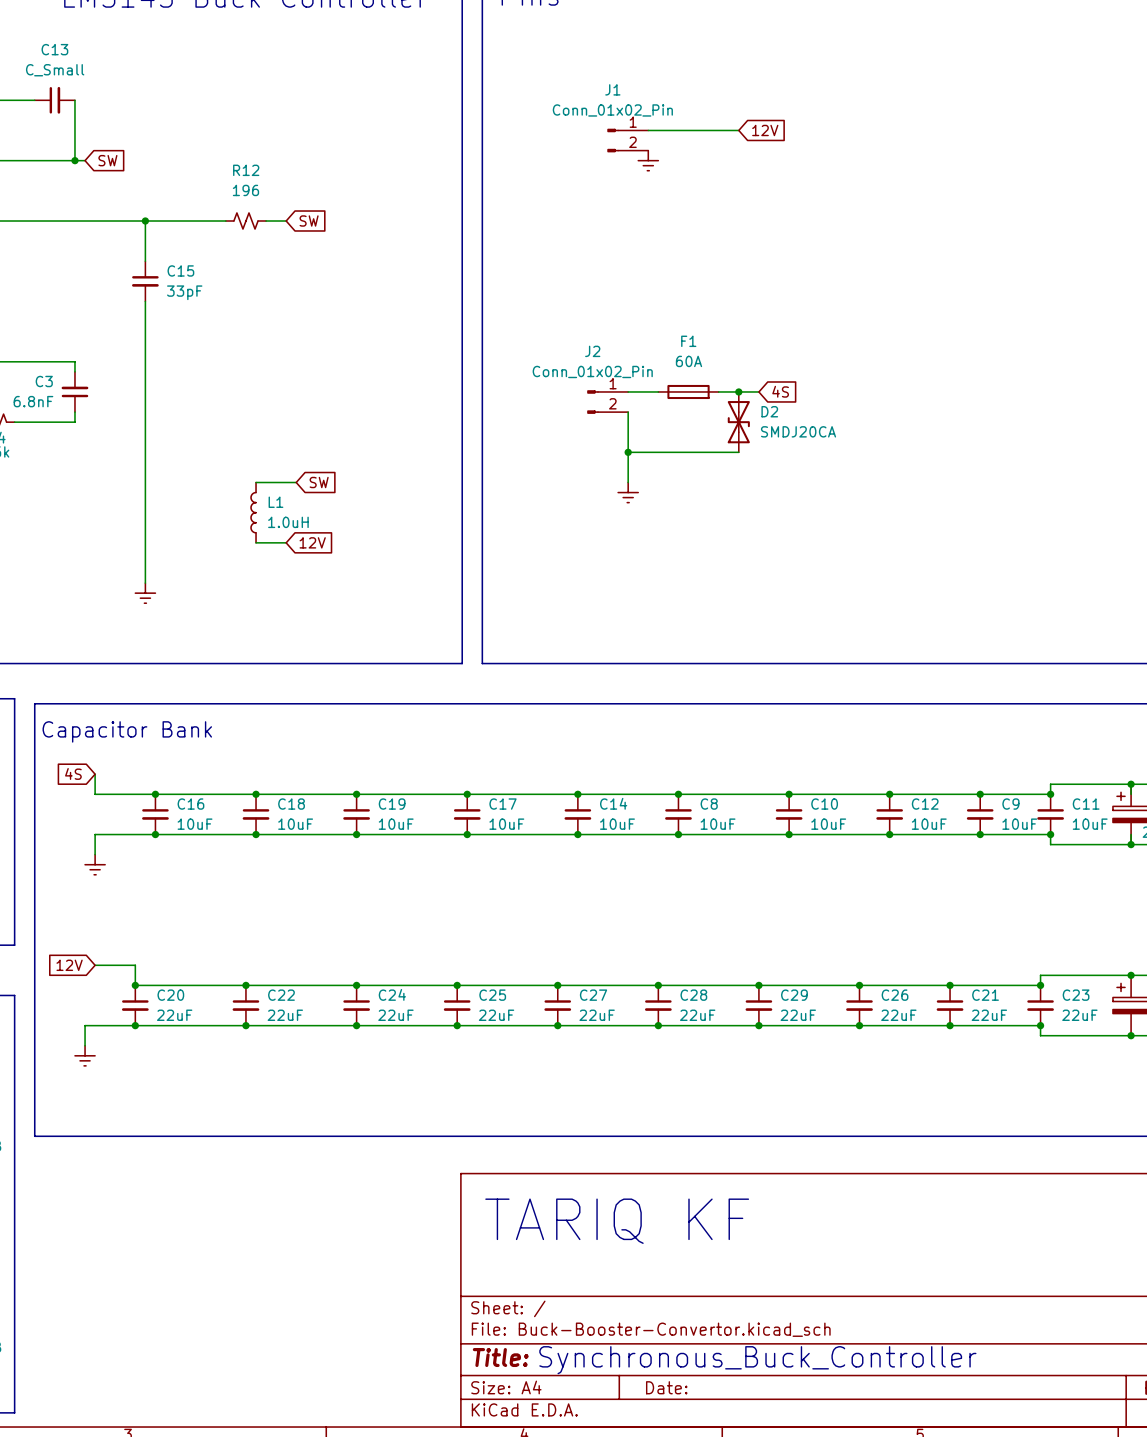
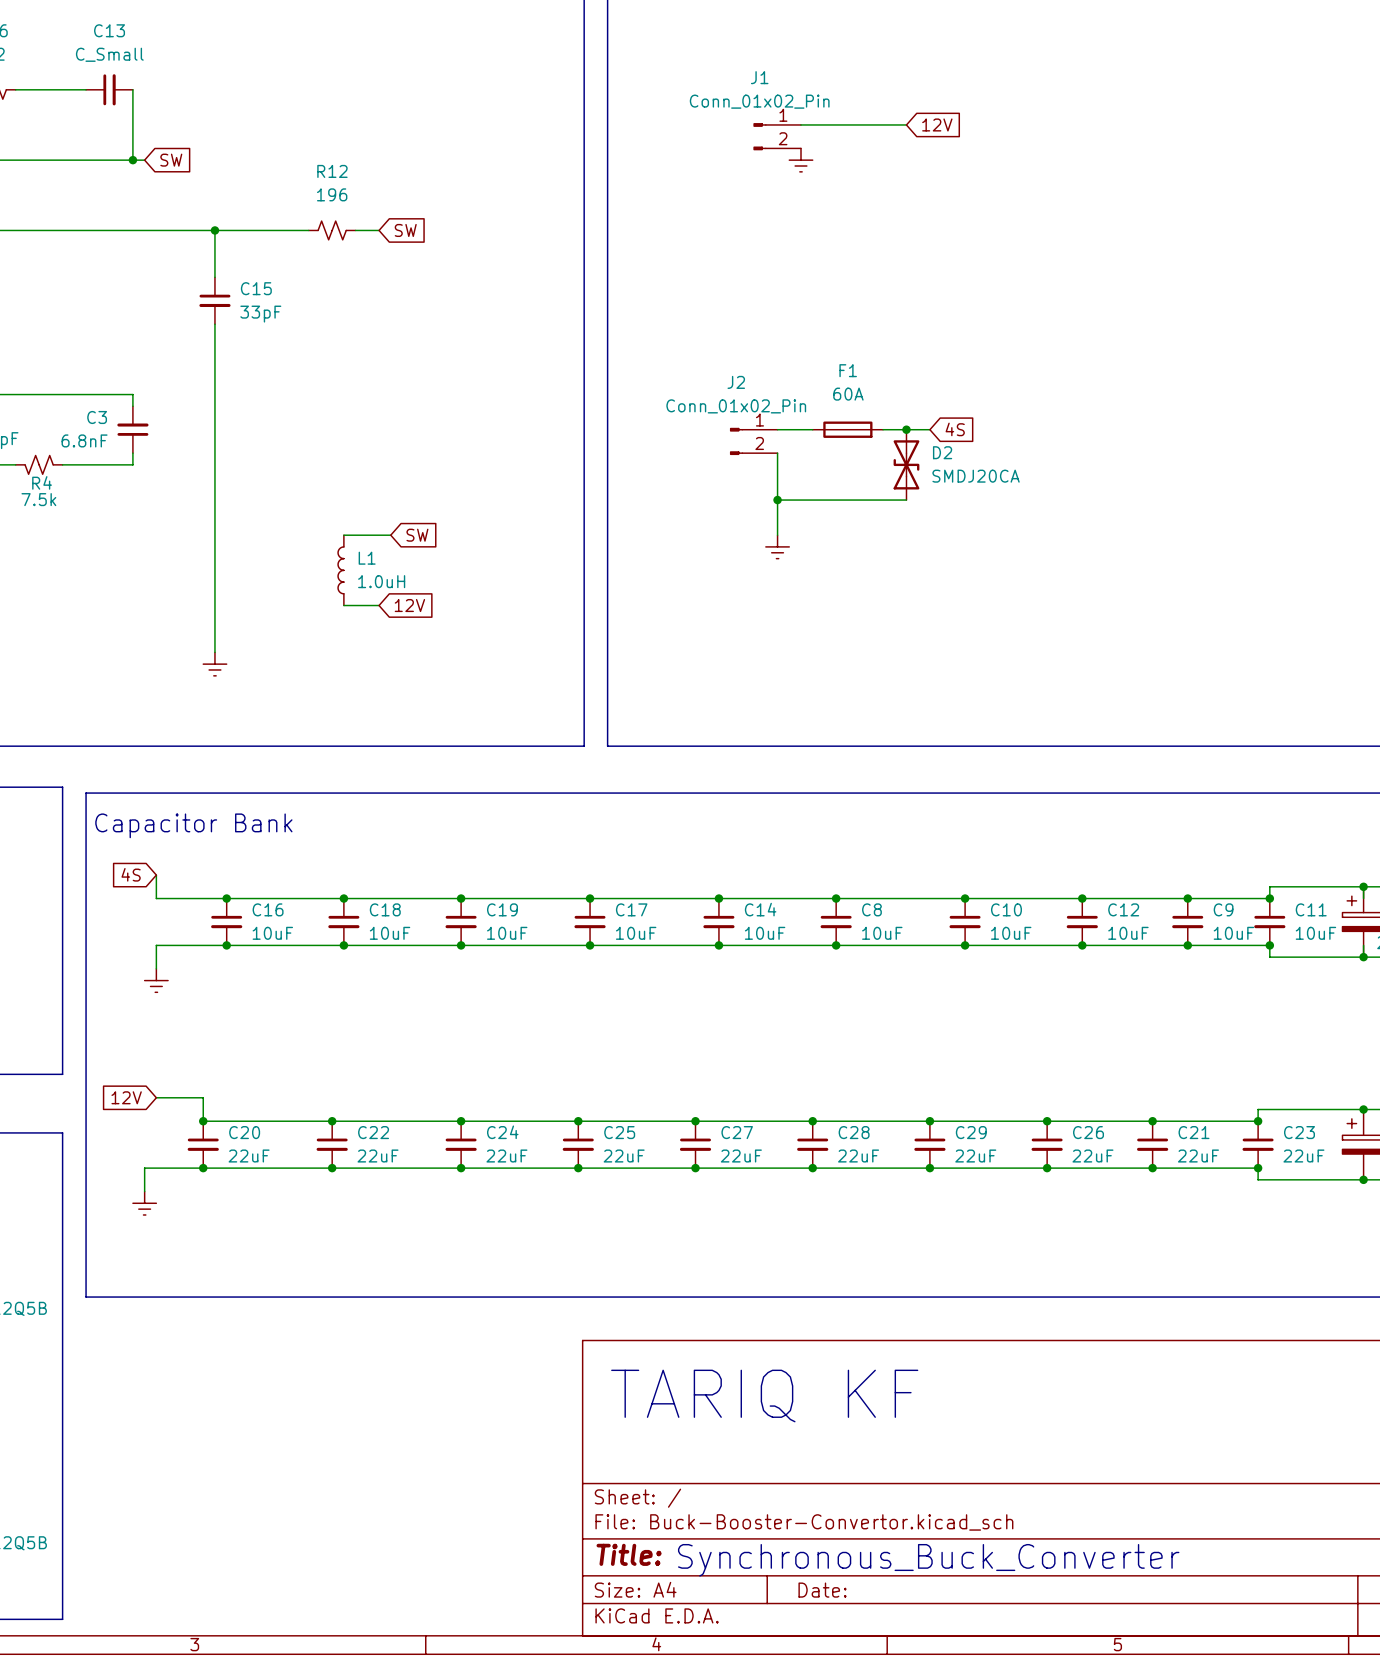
text: Synchronous_Buck_Controller (757, 1360) -> Synchronous_Buck_Converter (928, 1560)

